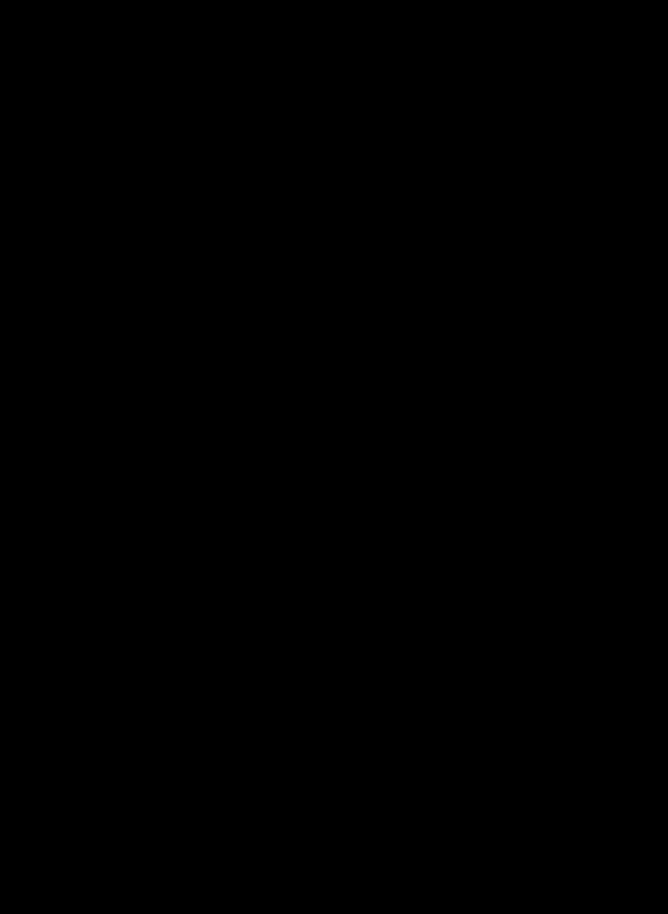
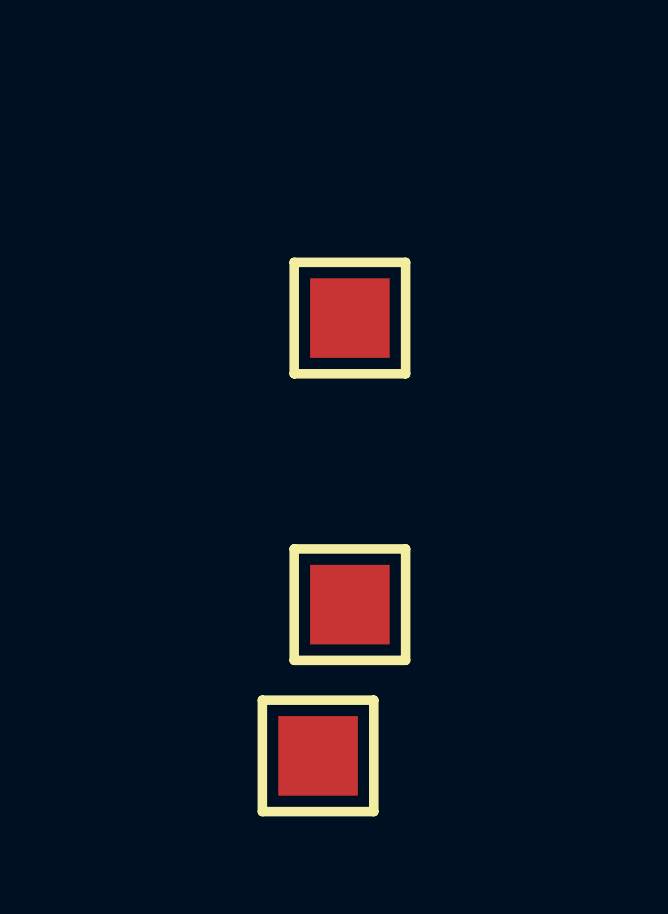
part: none -> (349, 318)
part: none -> (349, 604)
part: none -> (318, 755)

